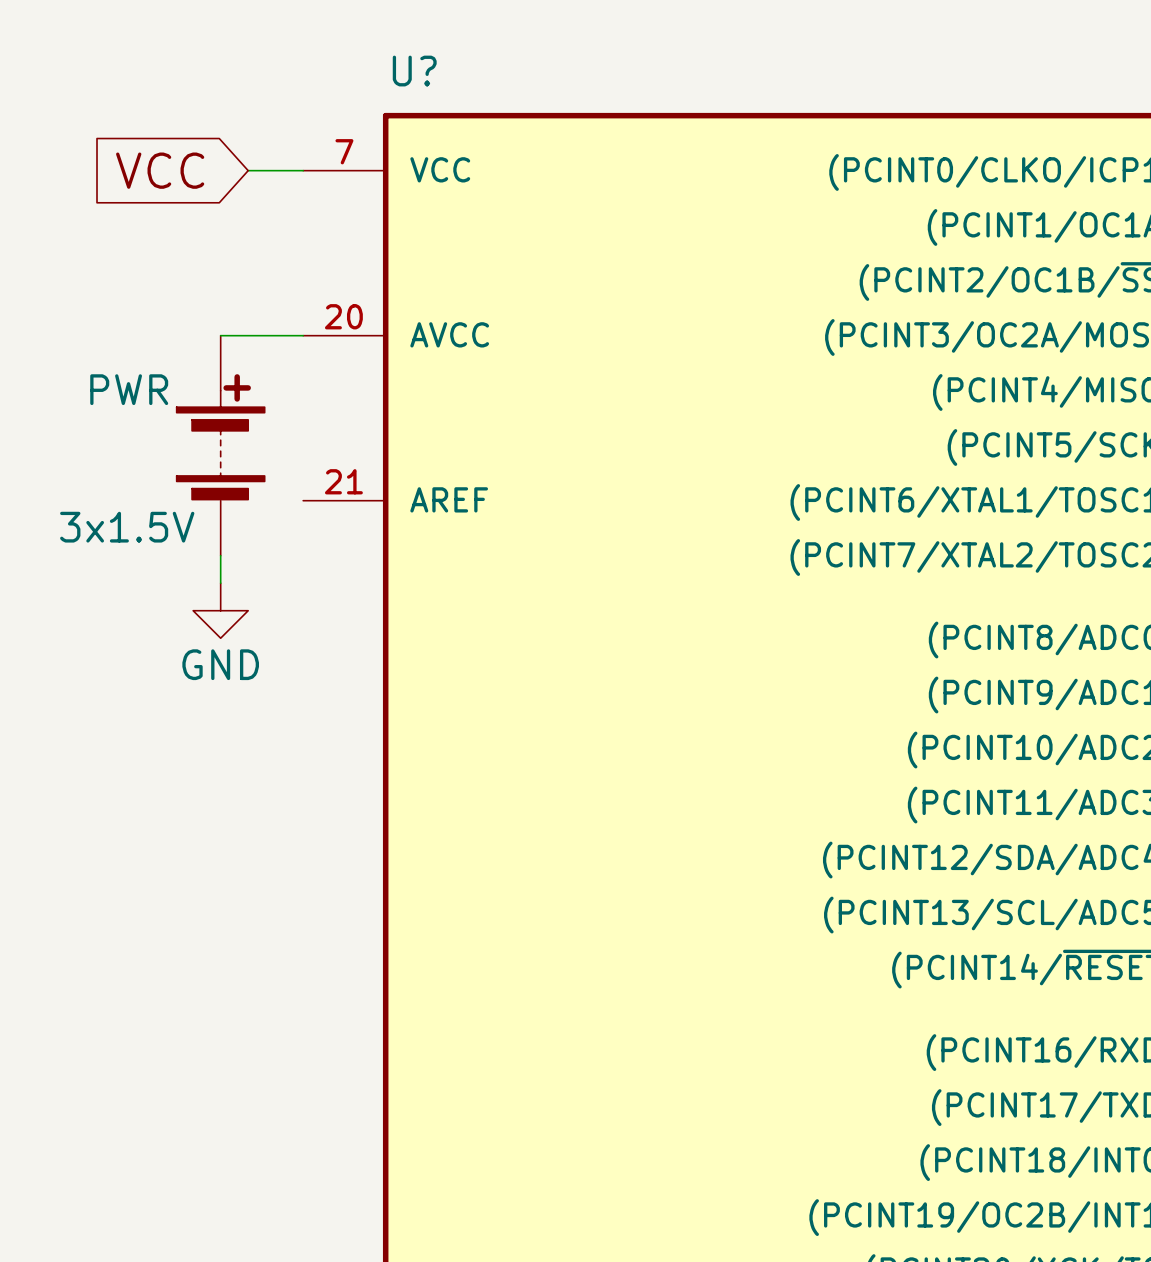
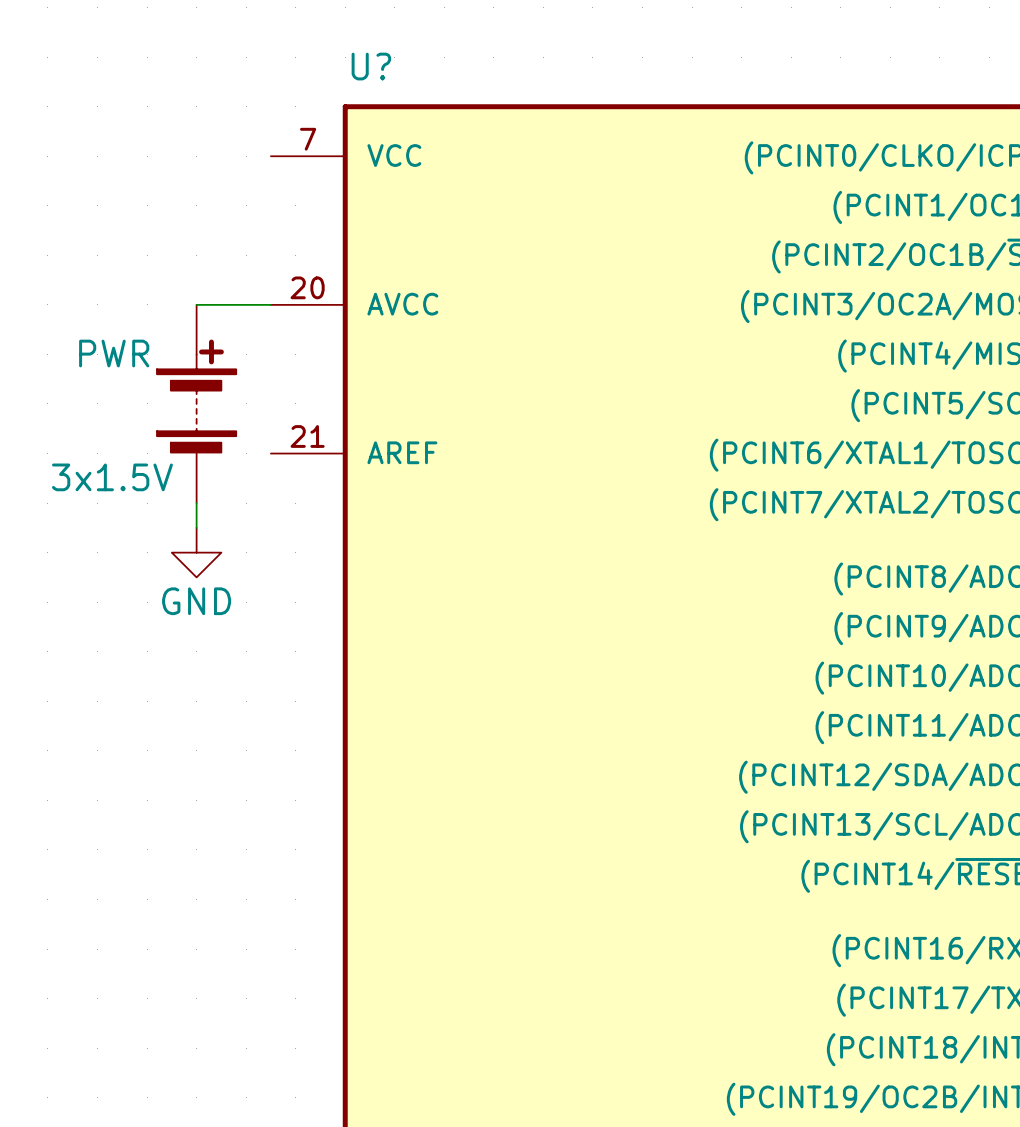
global label: VCC (160, 170) -> none
wire: (248, 170) (303, 170) -> none

